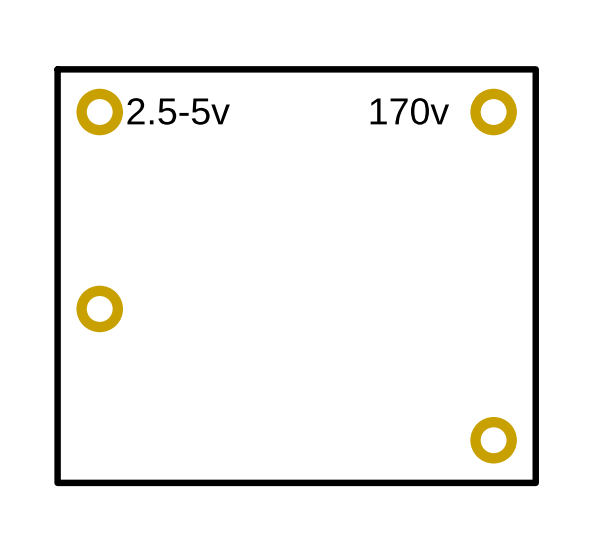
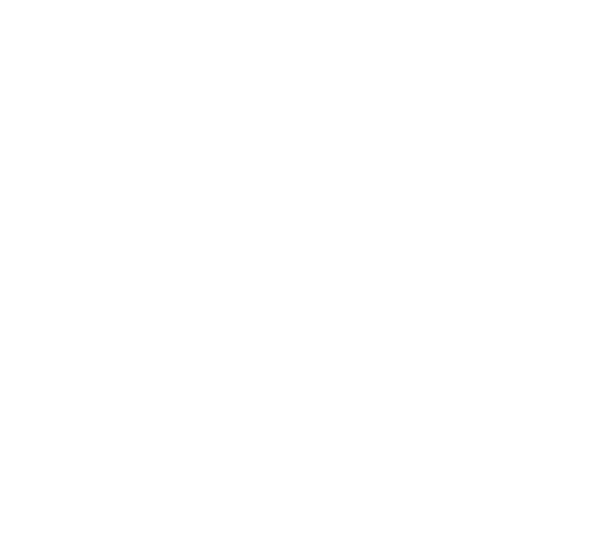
part: (296, 276) -> none

